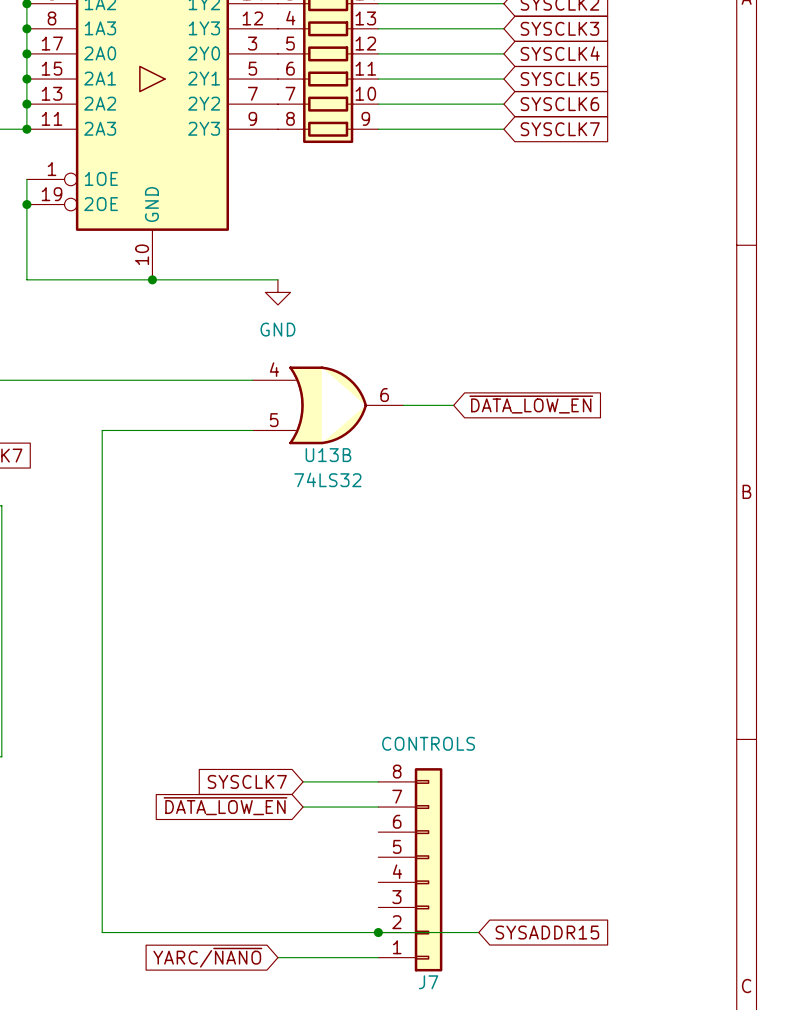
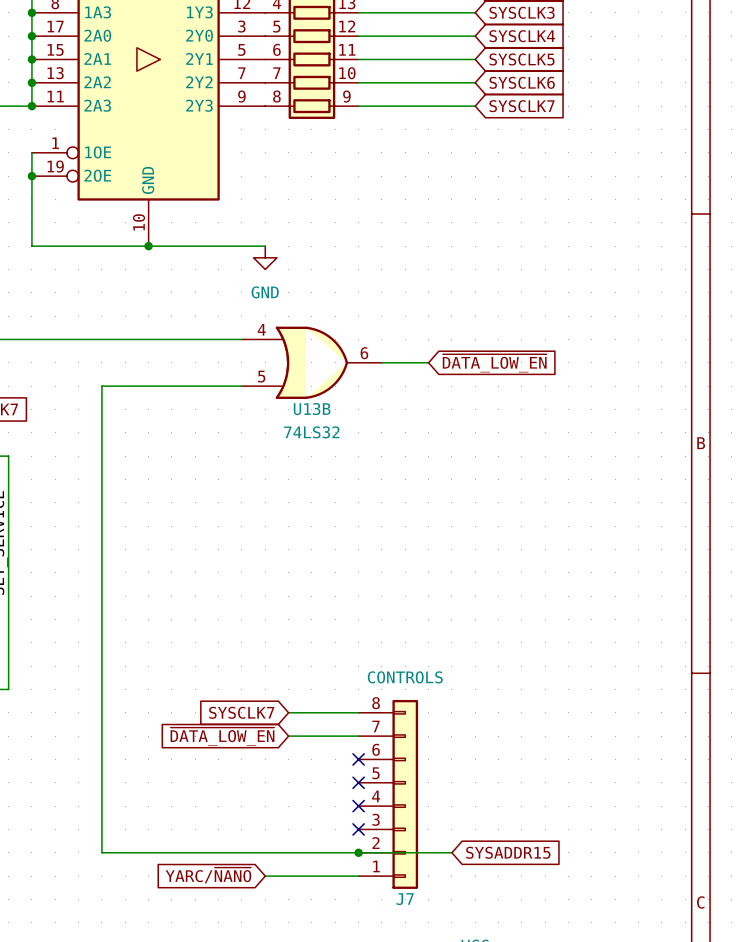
no-connect mark: none -> (358, 759)
no-connect mark: none -> (358, 782)
no-connect mark: none -> (358, 806)
no-connect mark: none -> (358, 829)

